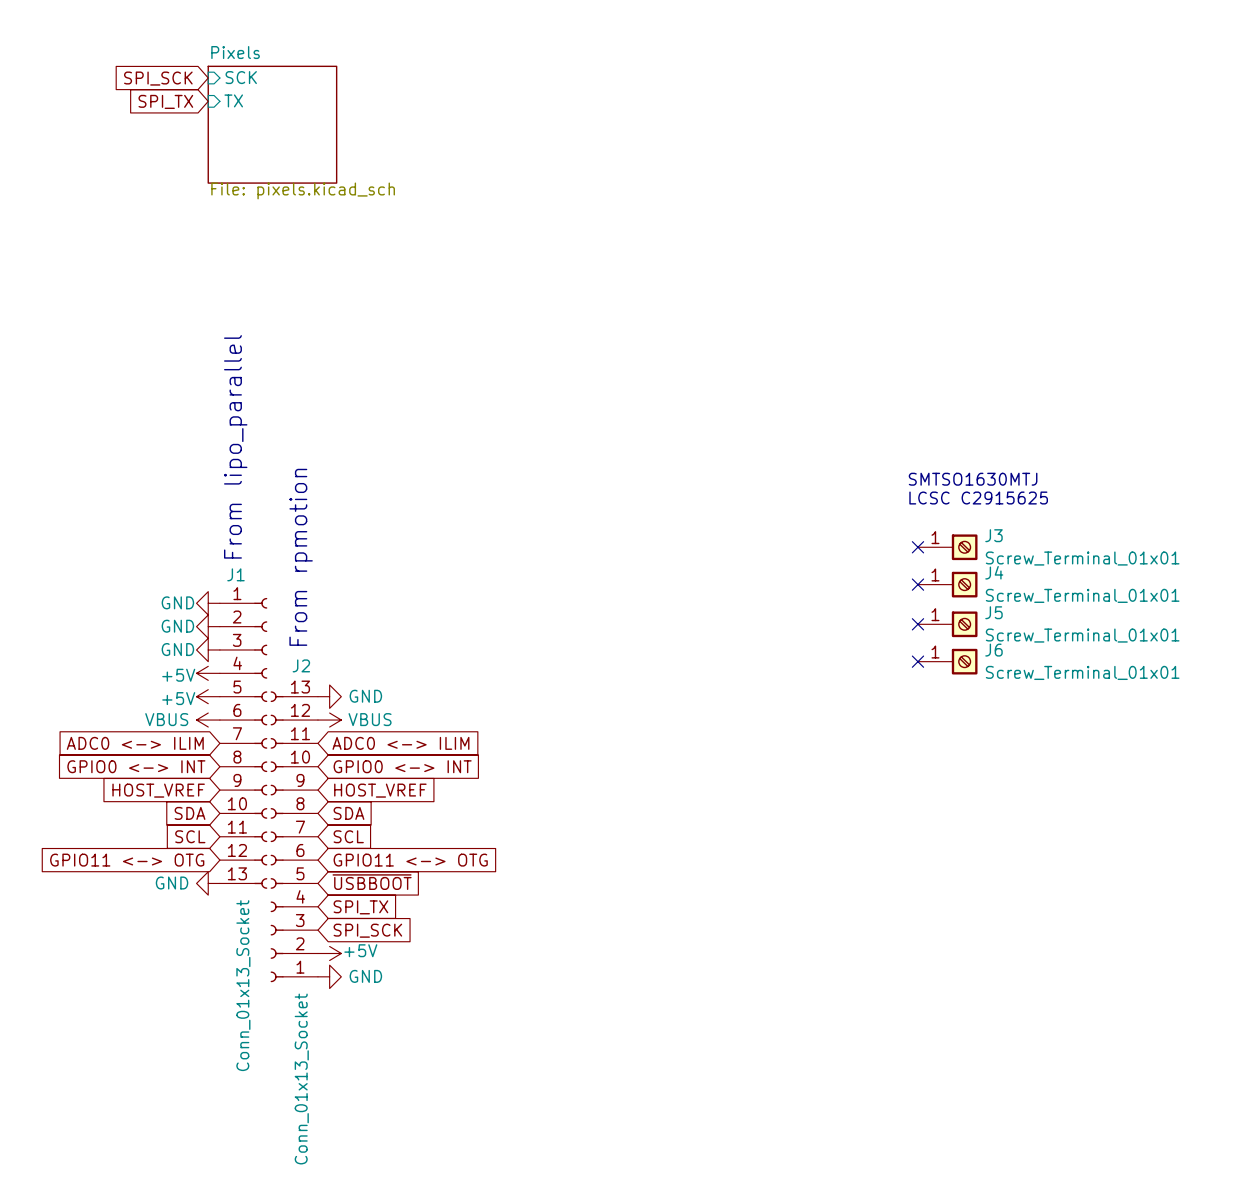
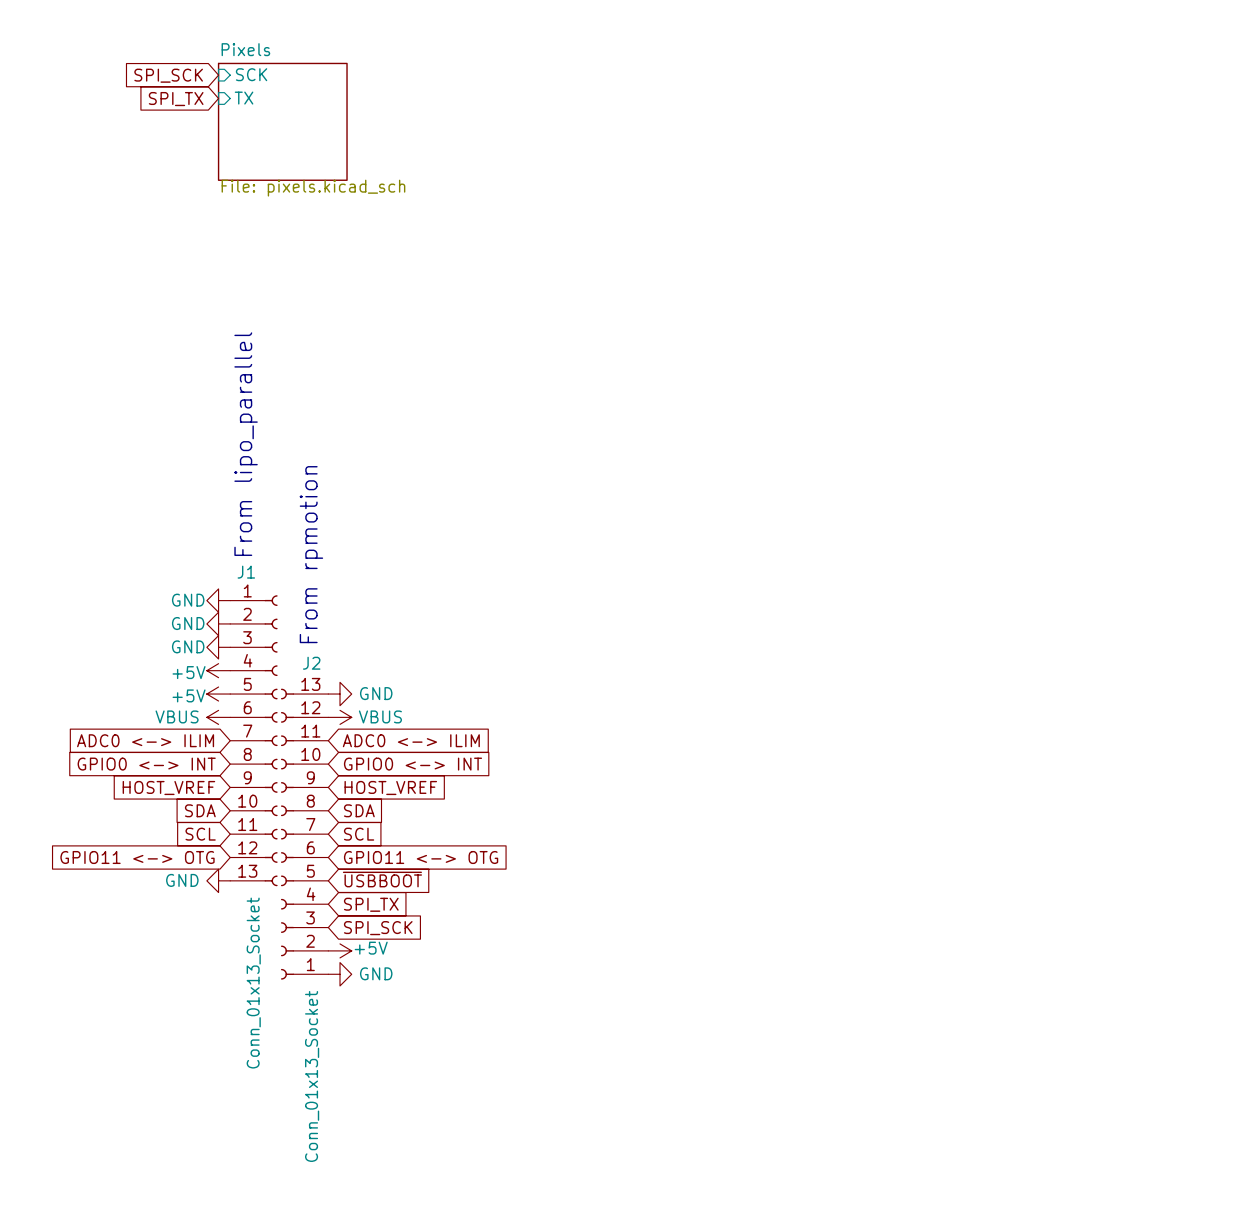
text: SMTSO1630MTJ (973, 479) -> none
text: LCSC C2915625 (978, 498) -> none
no-connect mark: (917, 547) -> none
J3: Screw_Terminal_01x01 (947, 547) -> none
no-connect mark: (917, 584) -> none
J4: Screw_Terminal_01x01 (947, 584) -> none
no-connect mark: (917, 624) -> none
J5: Screw_Terminal_01x01 (947, 624) -> none
no-connect mark: (917, 661) -> none
J6: Screw_Terminal_01x01 (947, 661) -> none

